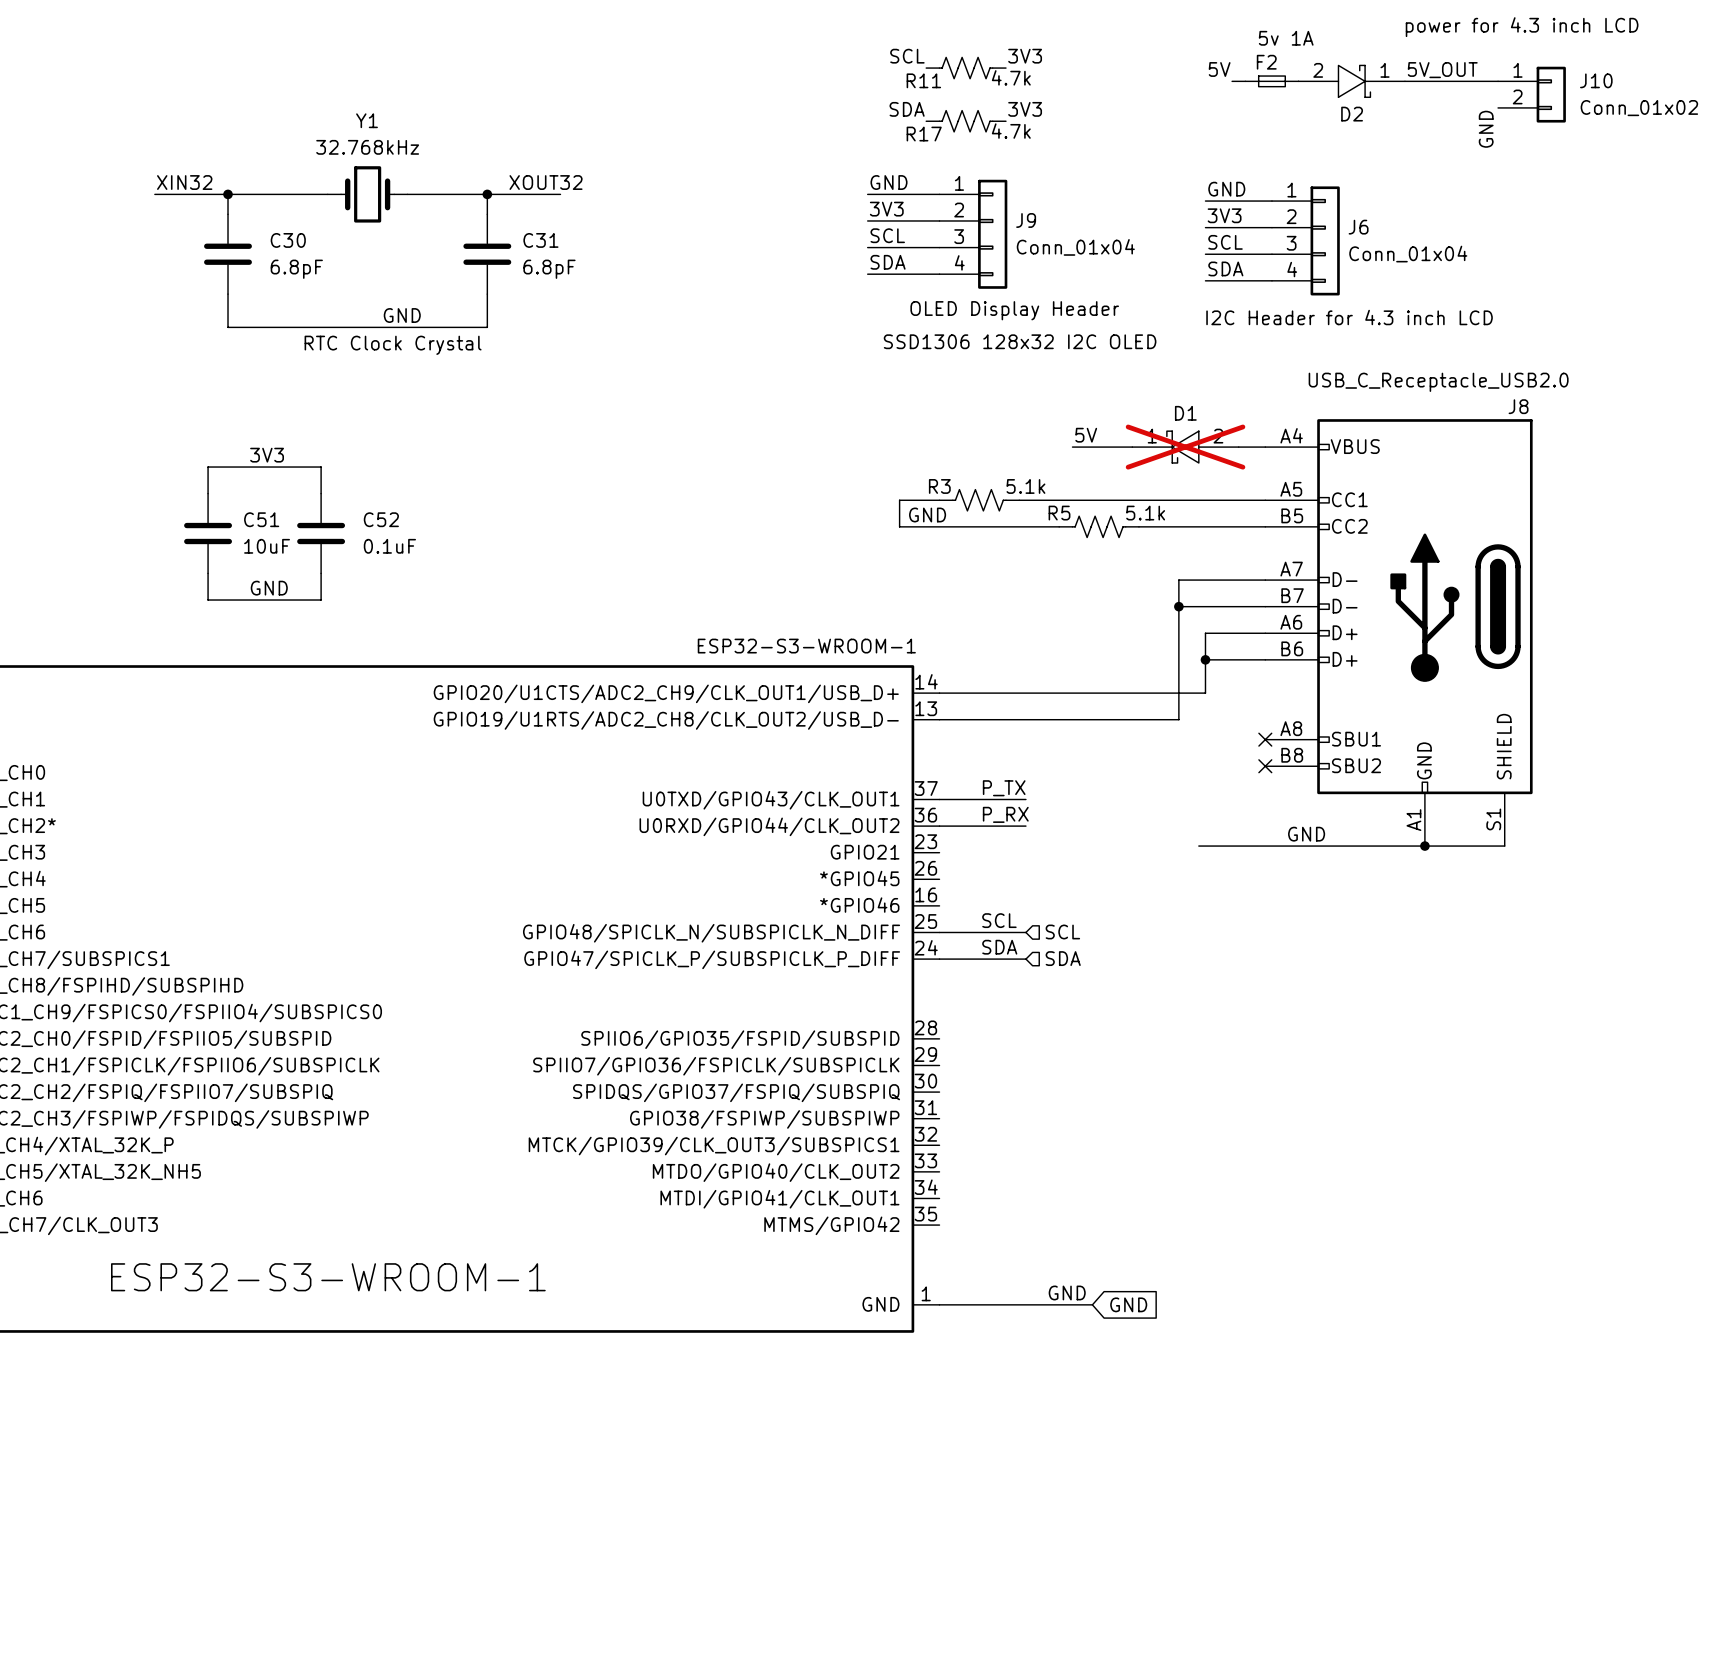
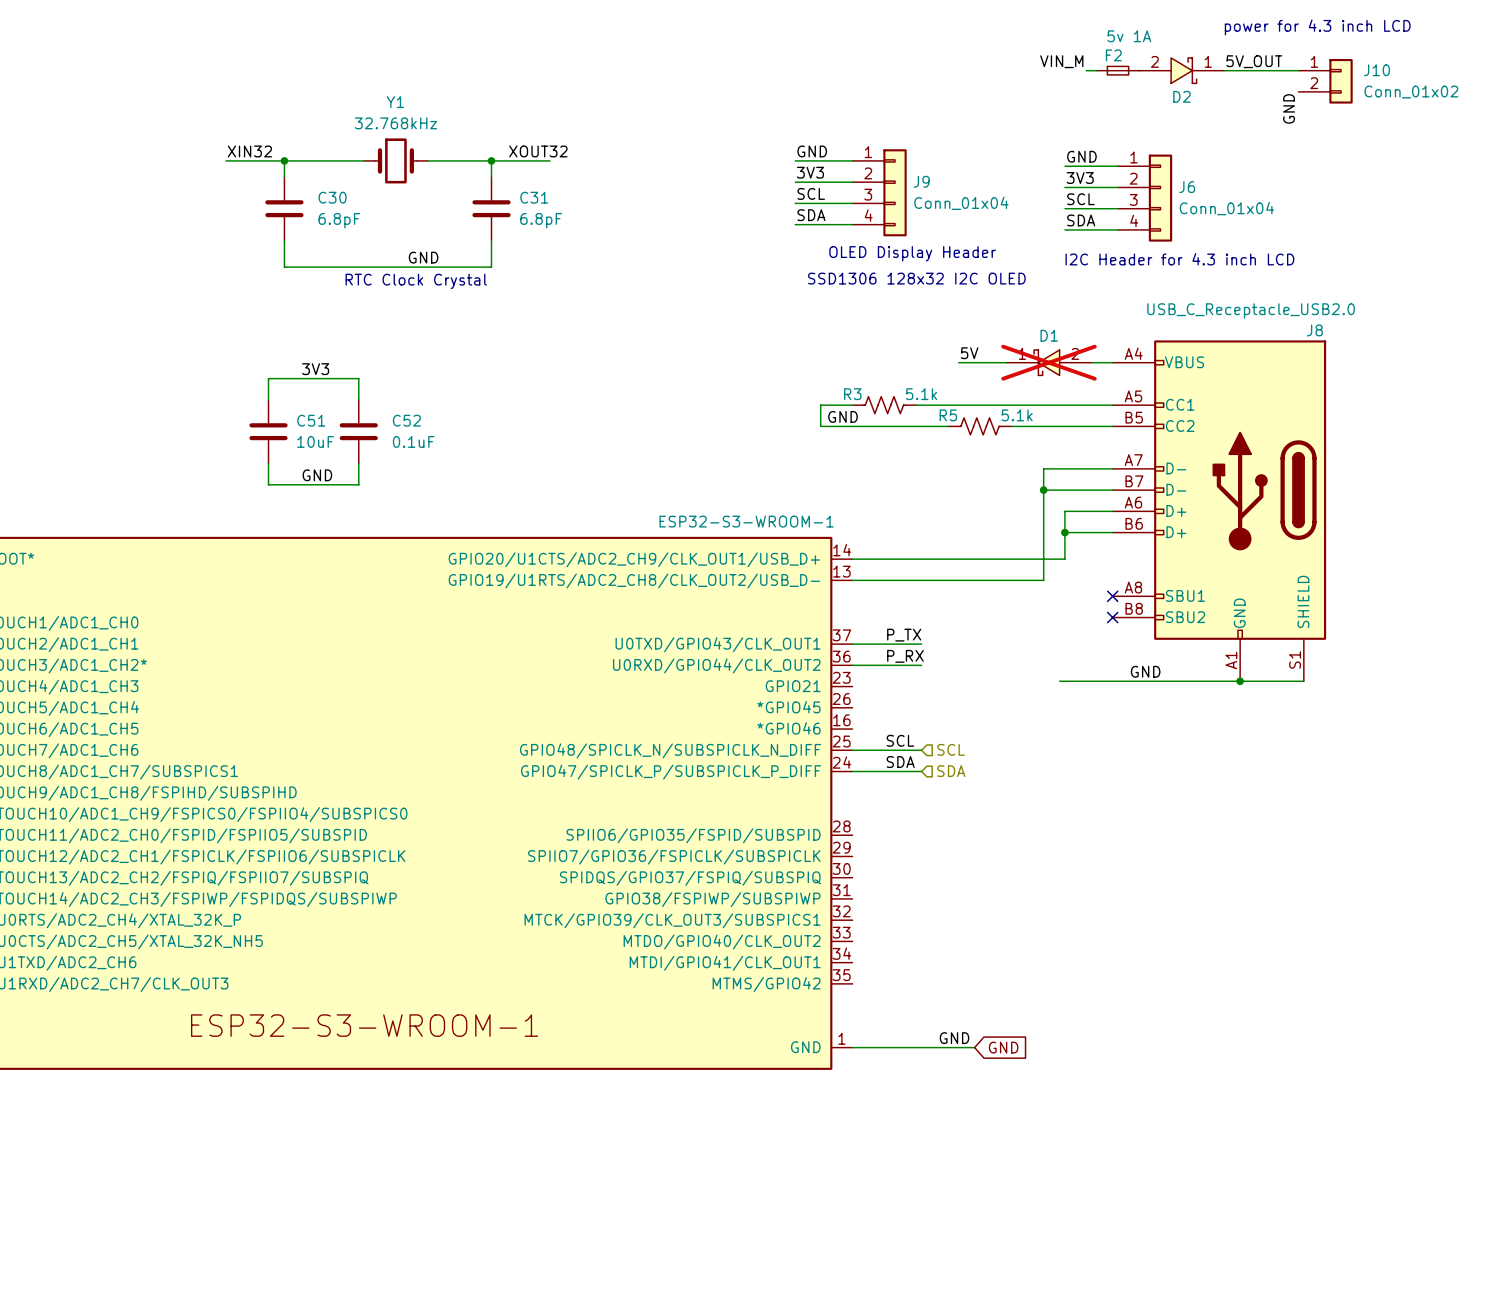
label: SCL (907, 56) -> none
label: 3V3 (1025, 56) -> none
R11: 4.7k (966, 68) -> none
label: 5V (1219, 69) -> VIN_M (1061, 61)
label: SDA (907, 109) -> none
label: 3V3 (1025, 109) -> none
R17: 4.7k (966, 121) -> none

